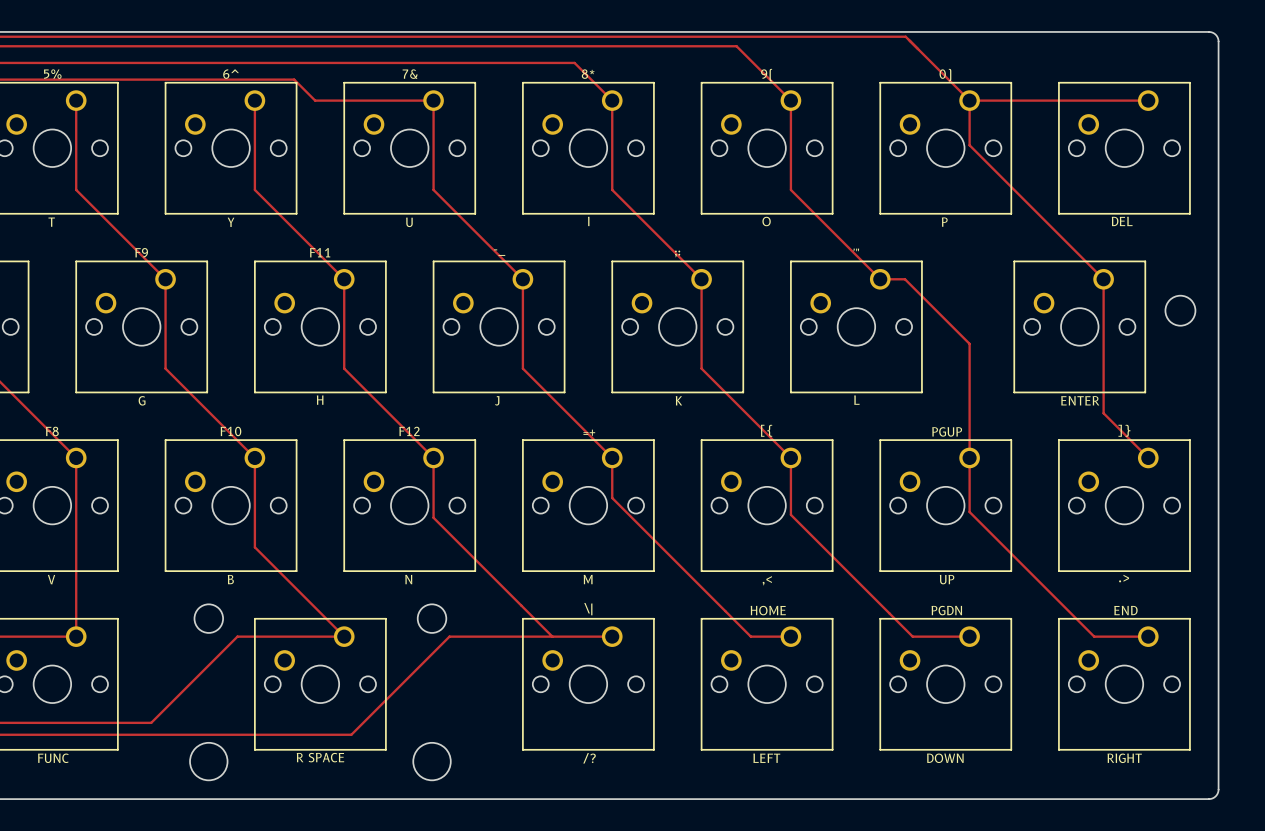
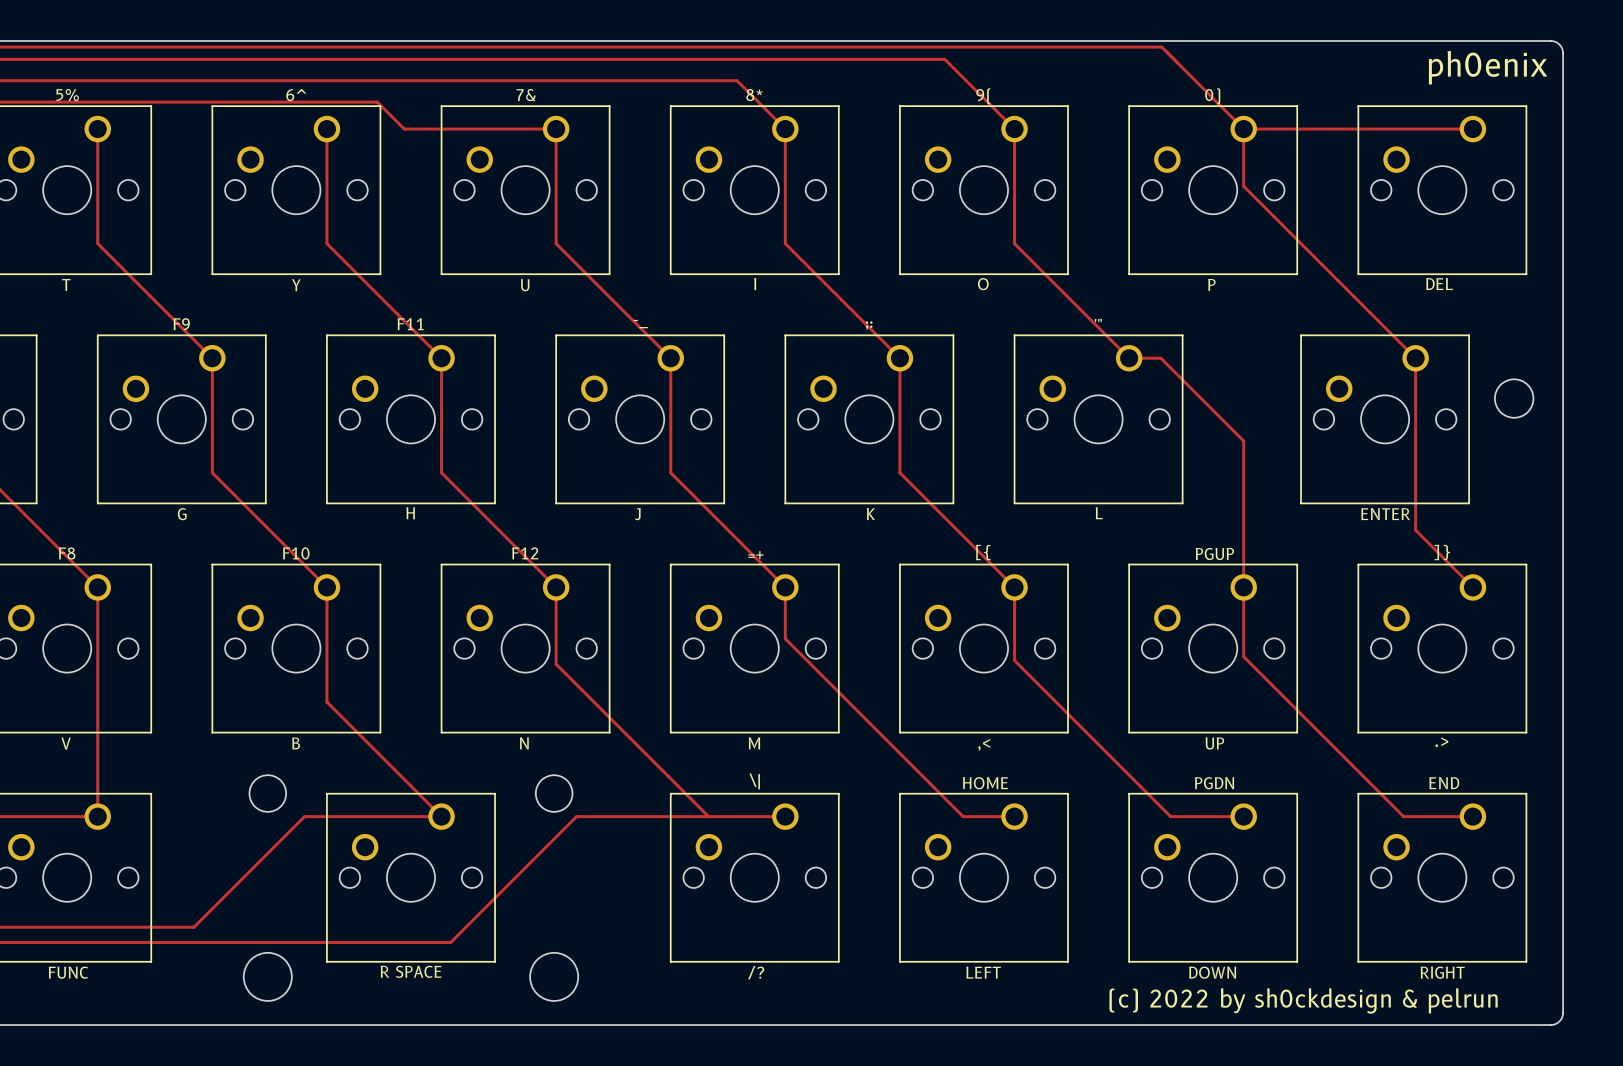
text: none -> ph0enix (1488, 67)
text: none -> (c) 2022 by sh0ckdesign & pelrun (1303, 1000)

